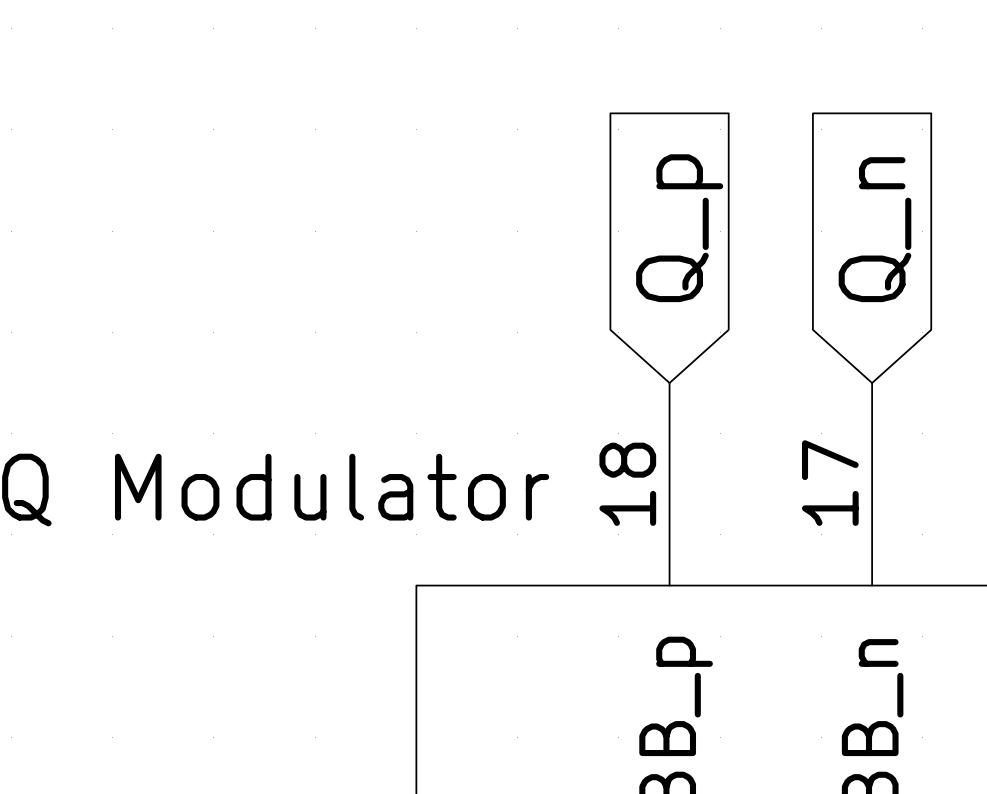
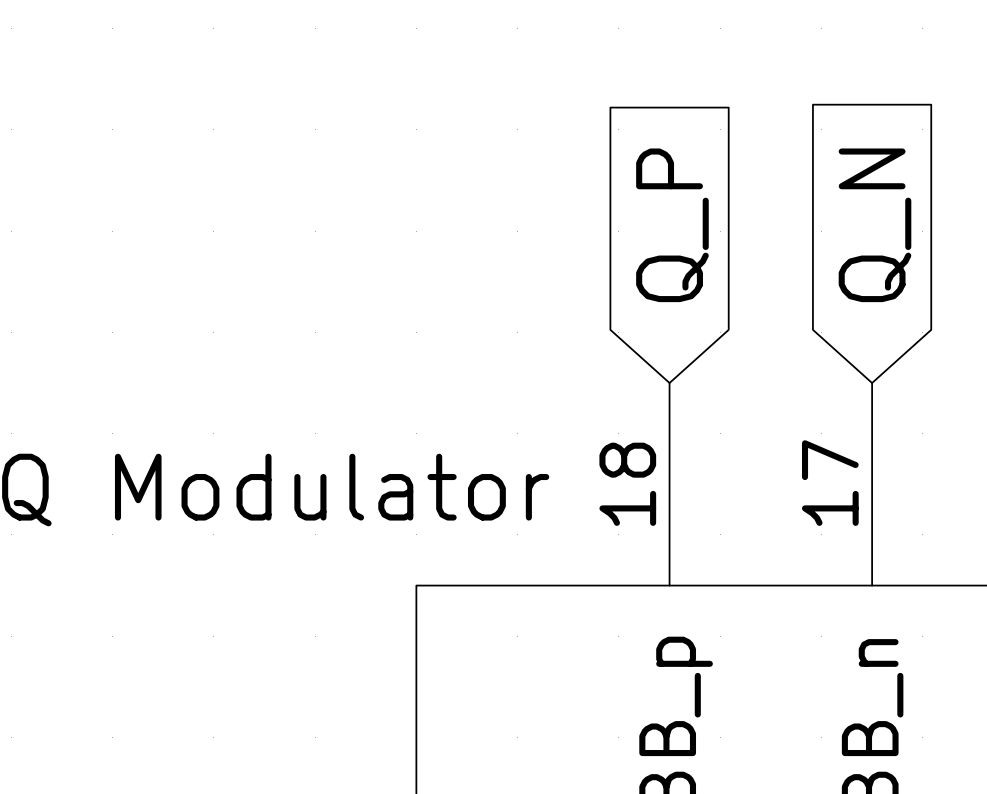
global label: Q_p (679, 228) -> Q_P (672, 225)
global label: Q_n (874, 229) -> Q_N (874, 225)

